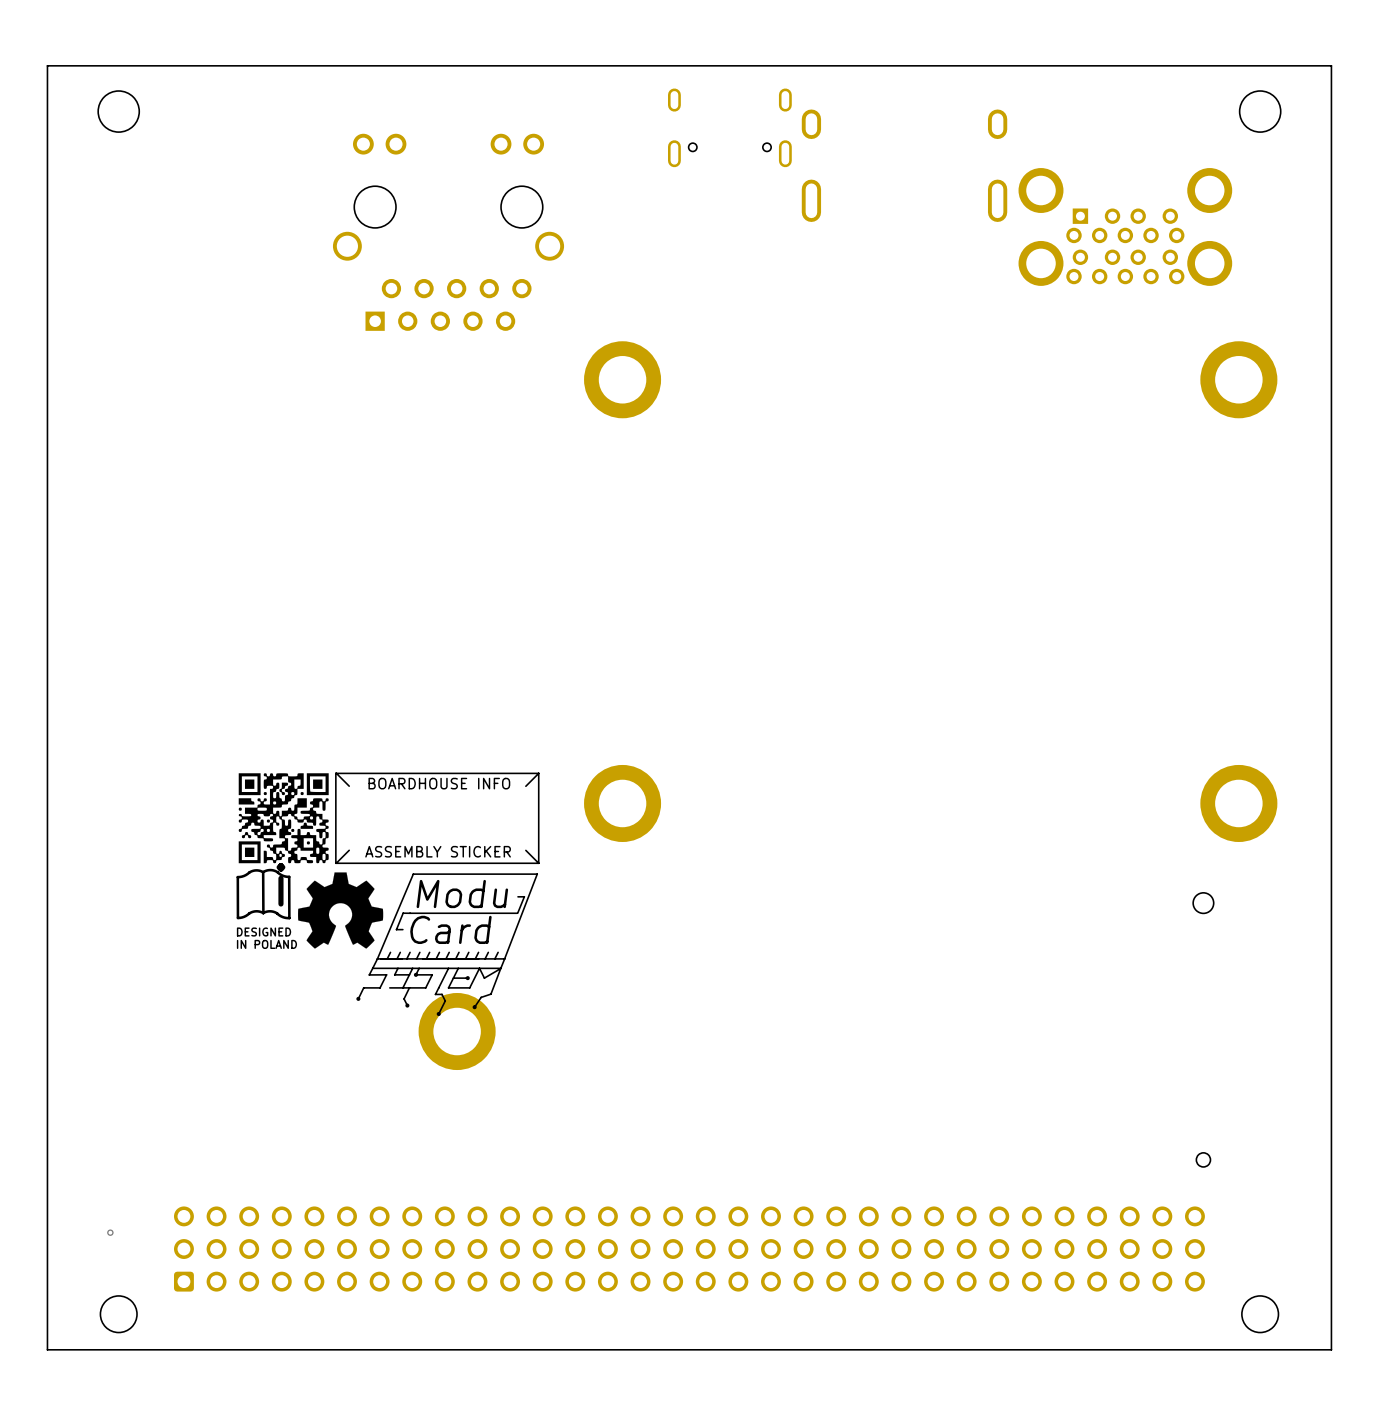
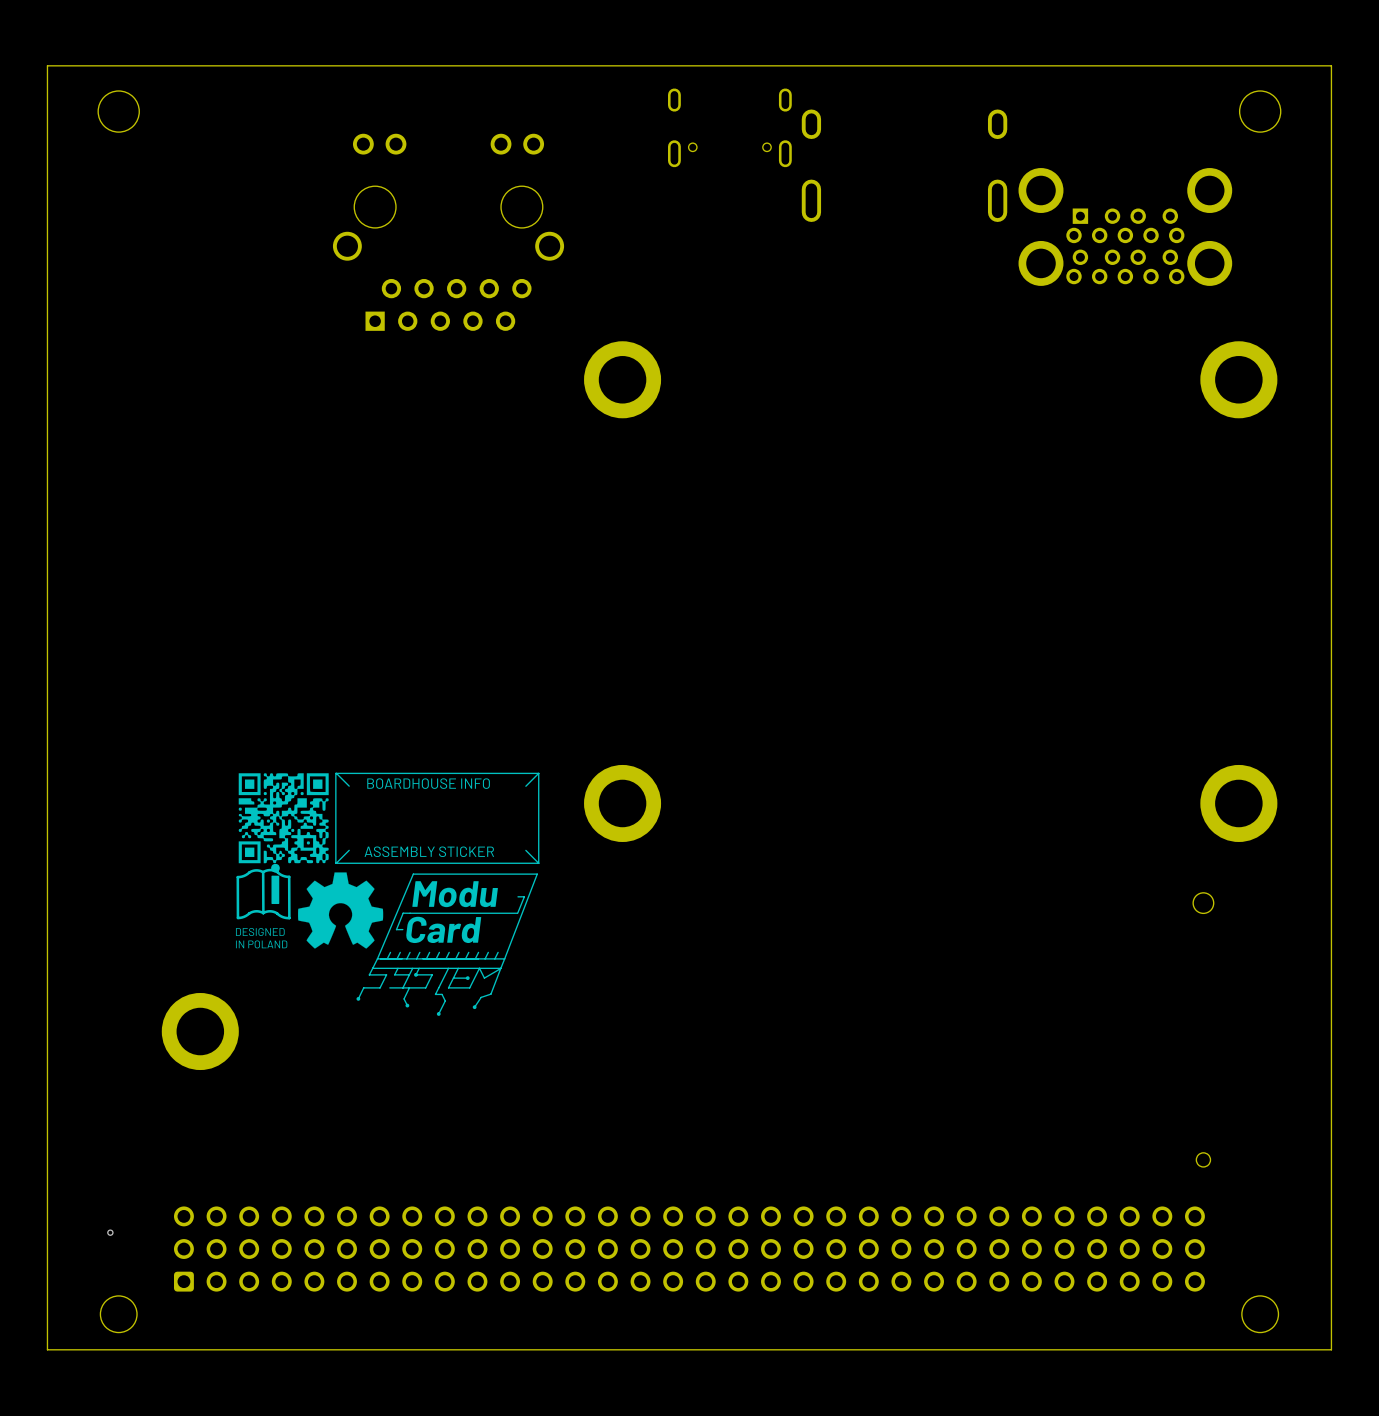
part position: (457, 1031) -> (200, 1031)

